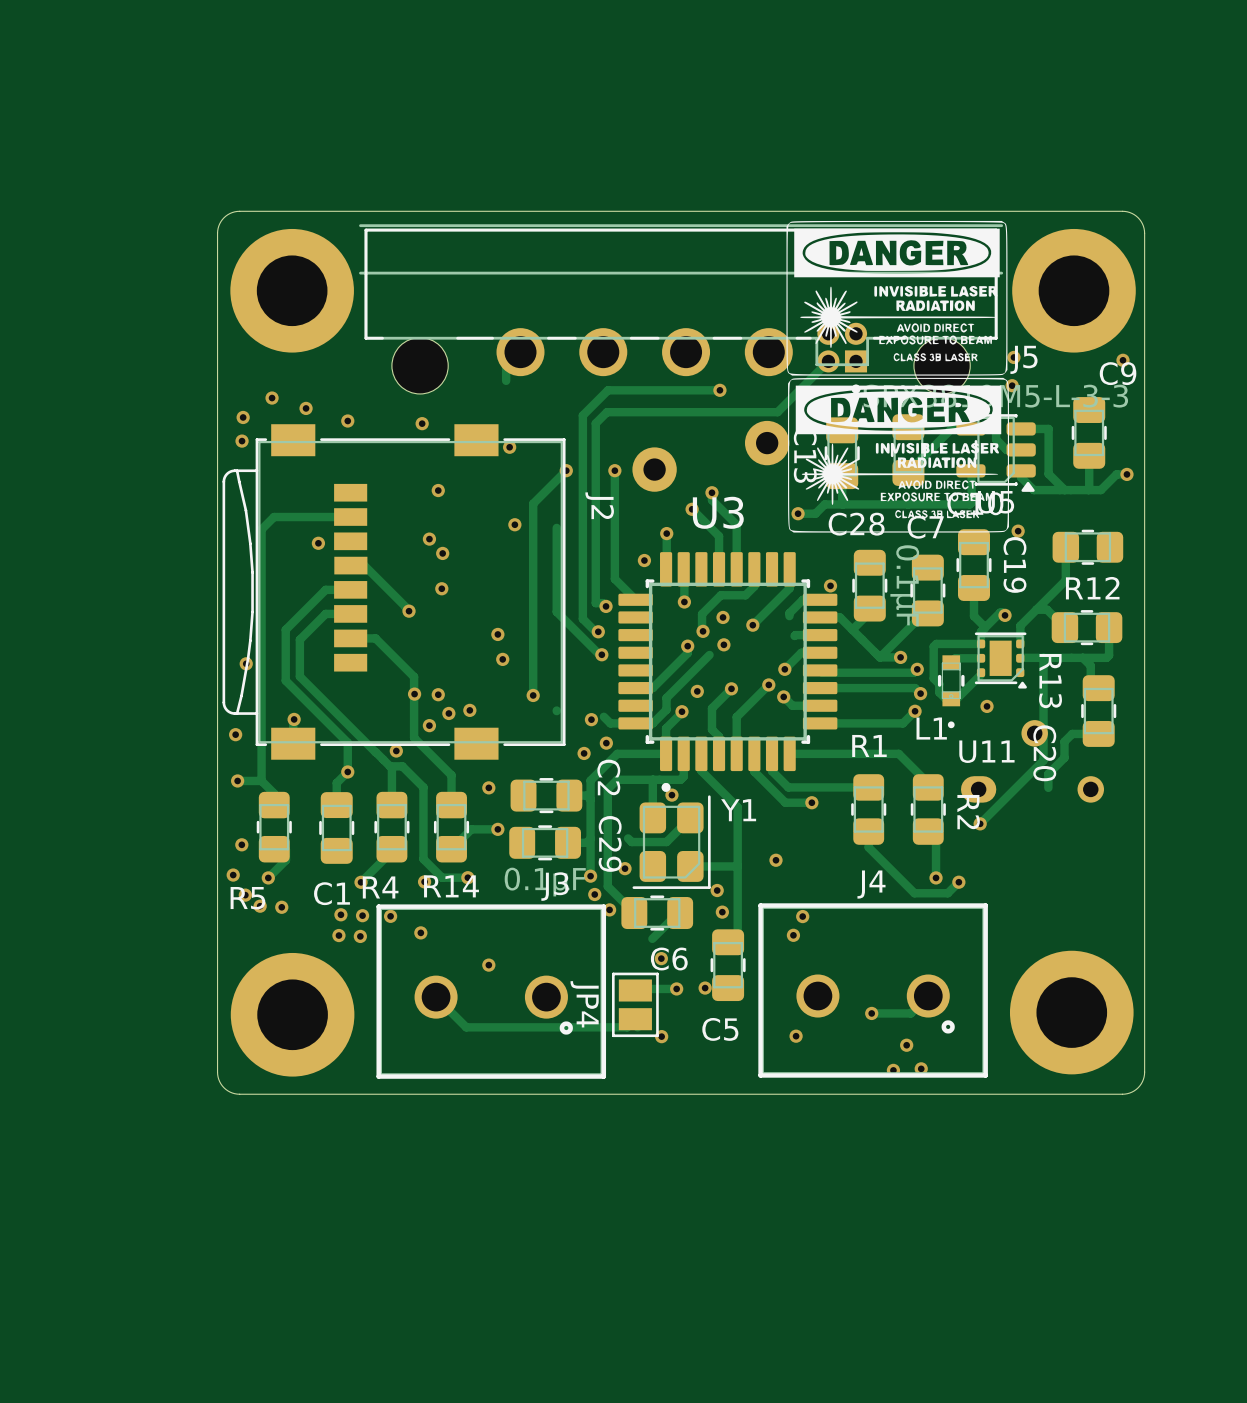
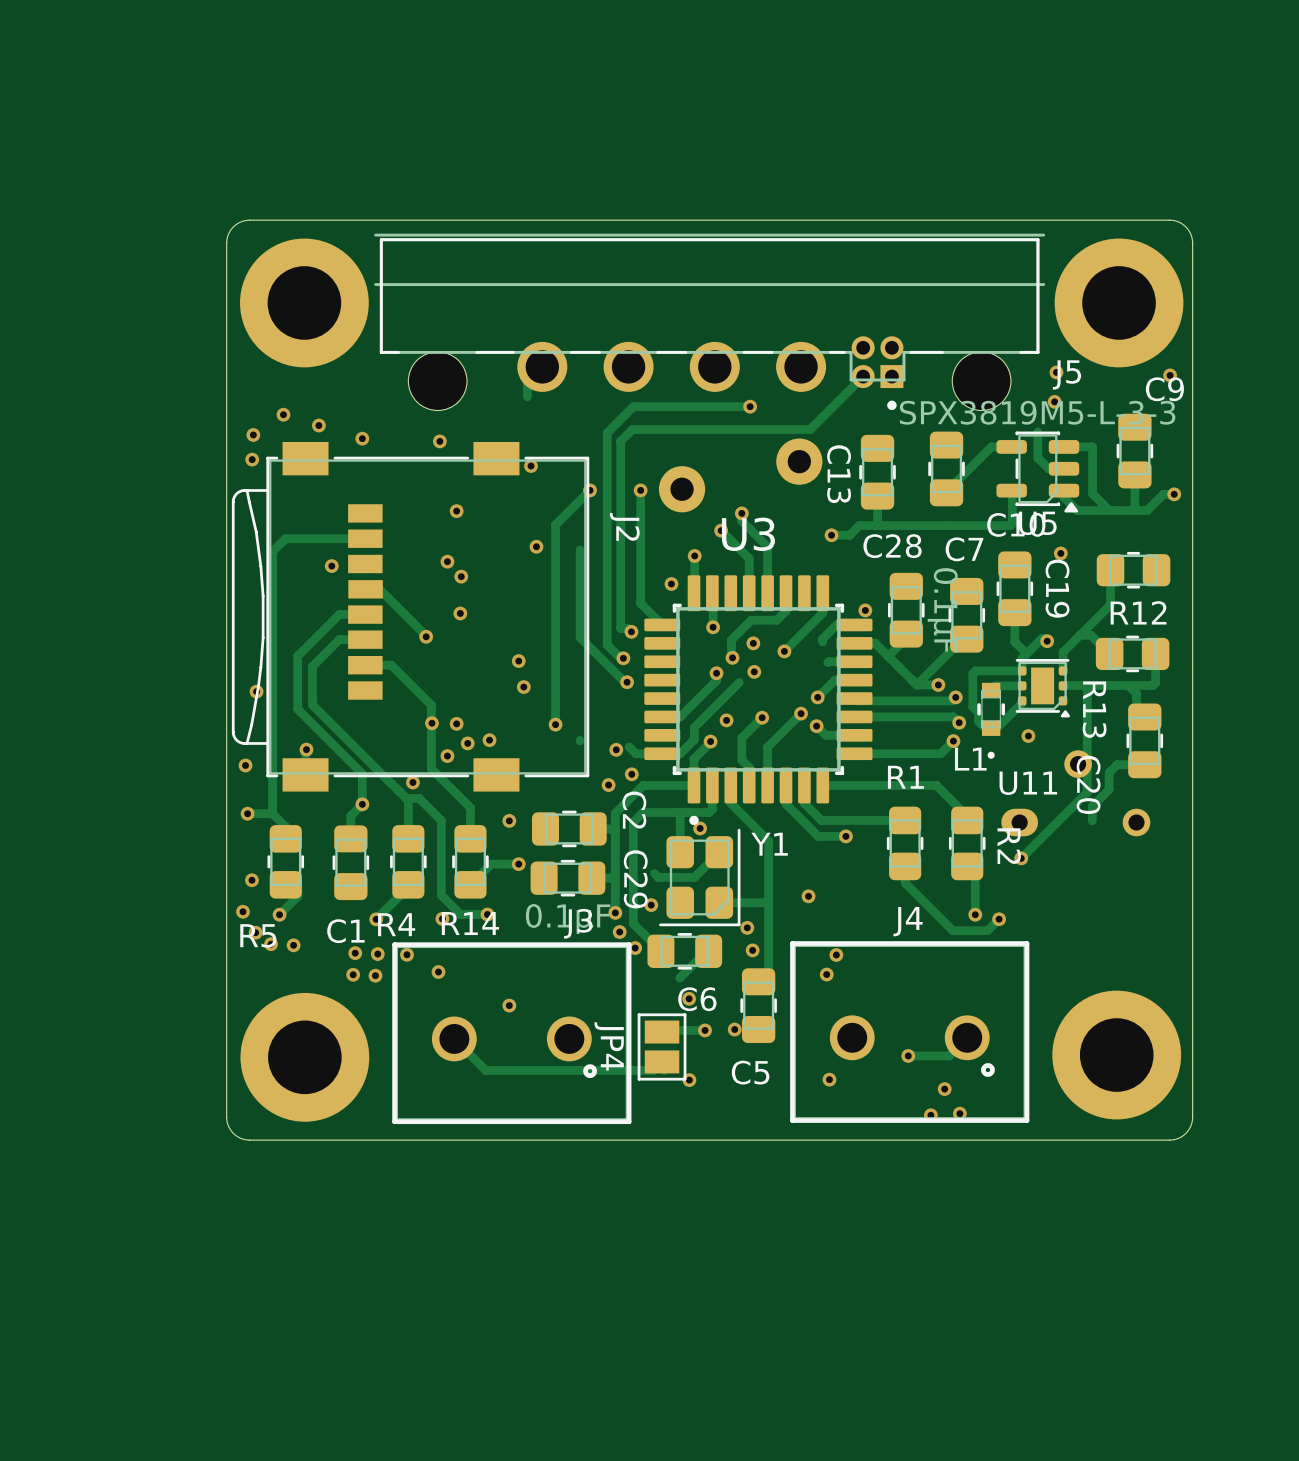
drawing: [786, 220, 1009, 533] -> none

